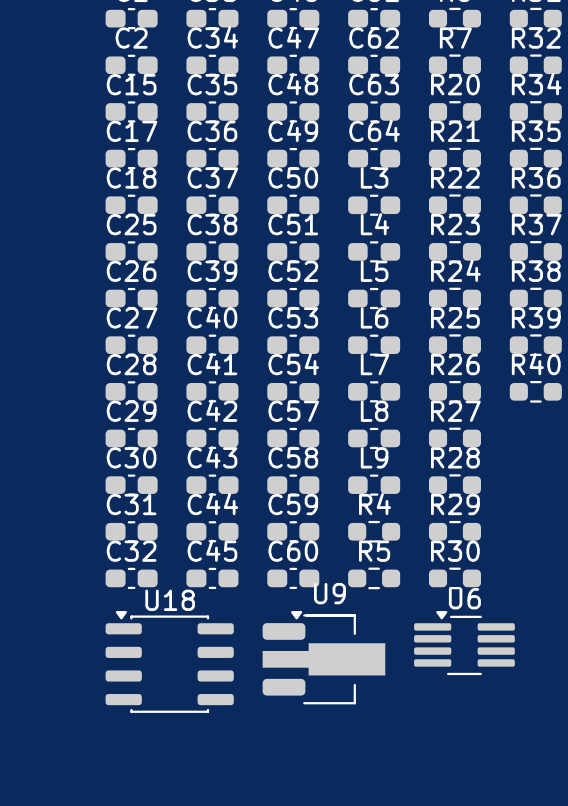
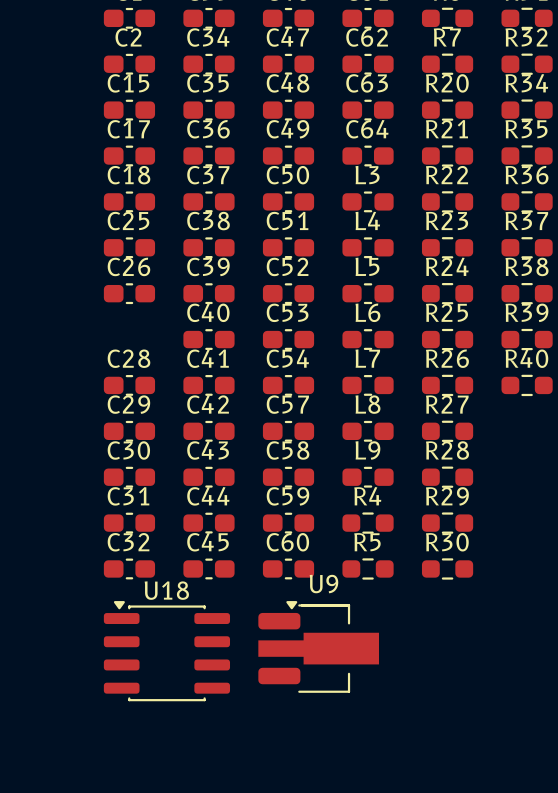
C27: (131, 345) -> none
U6: (464, 643) -> none

